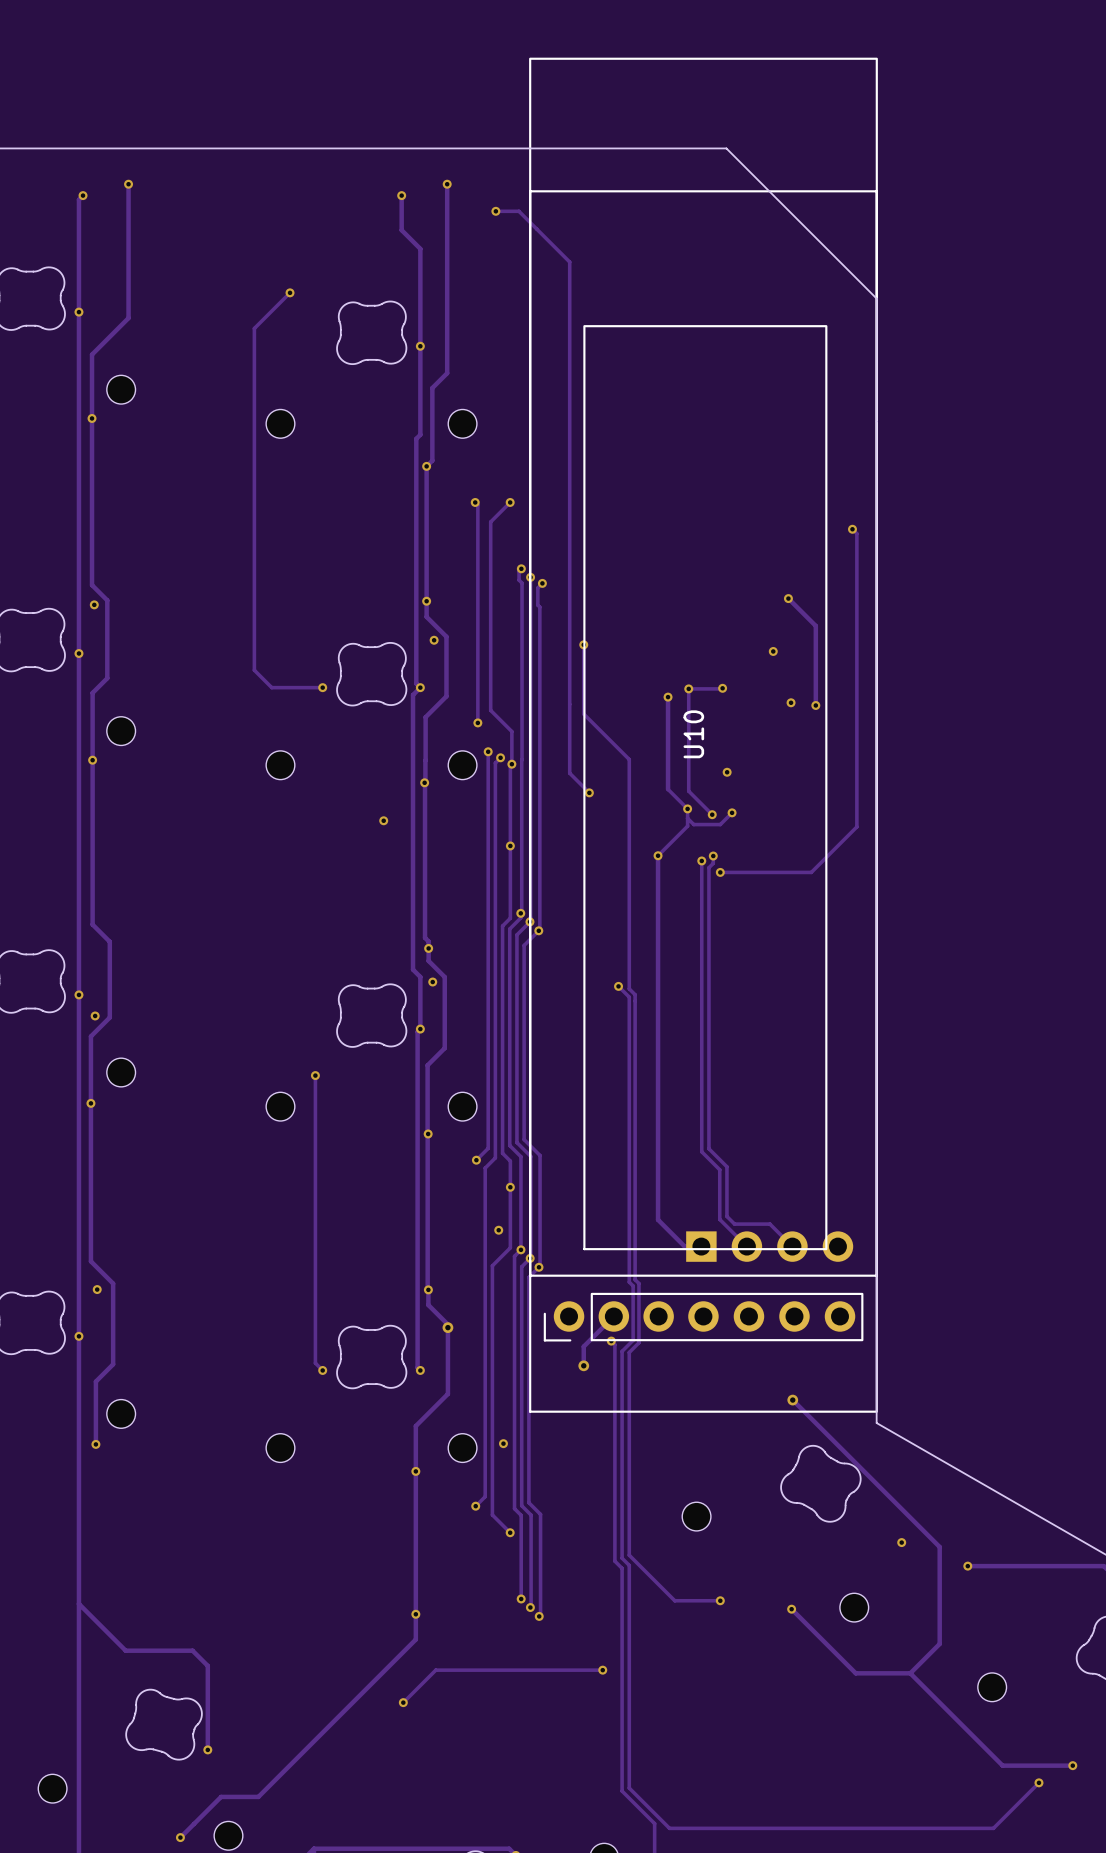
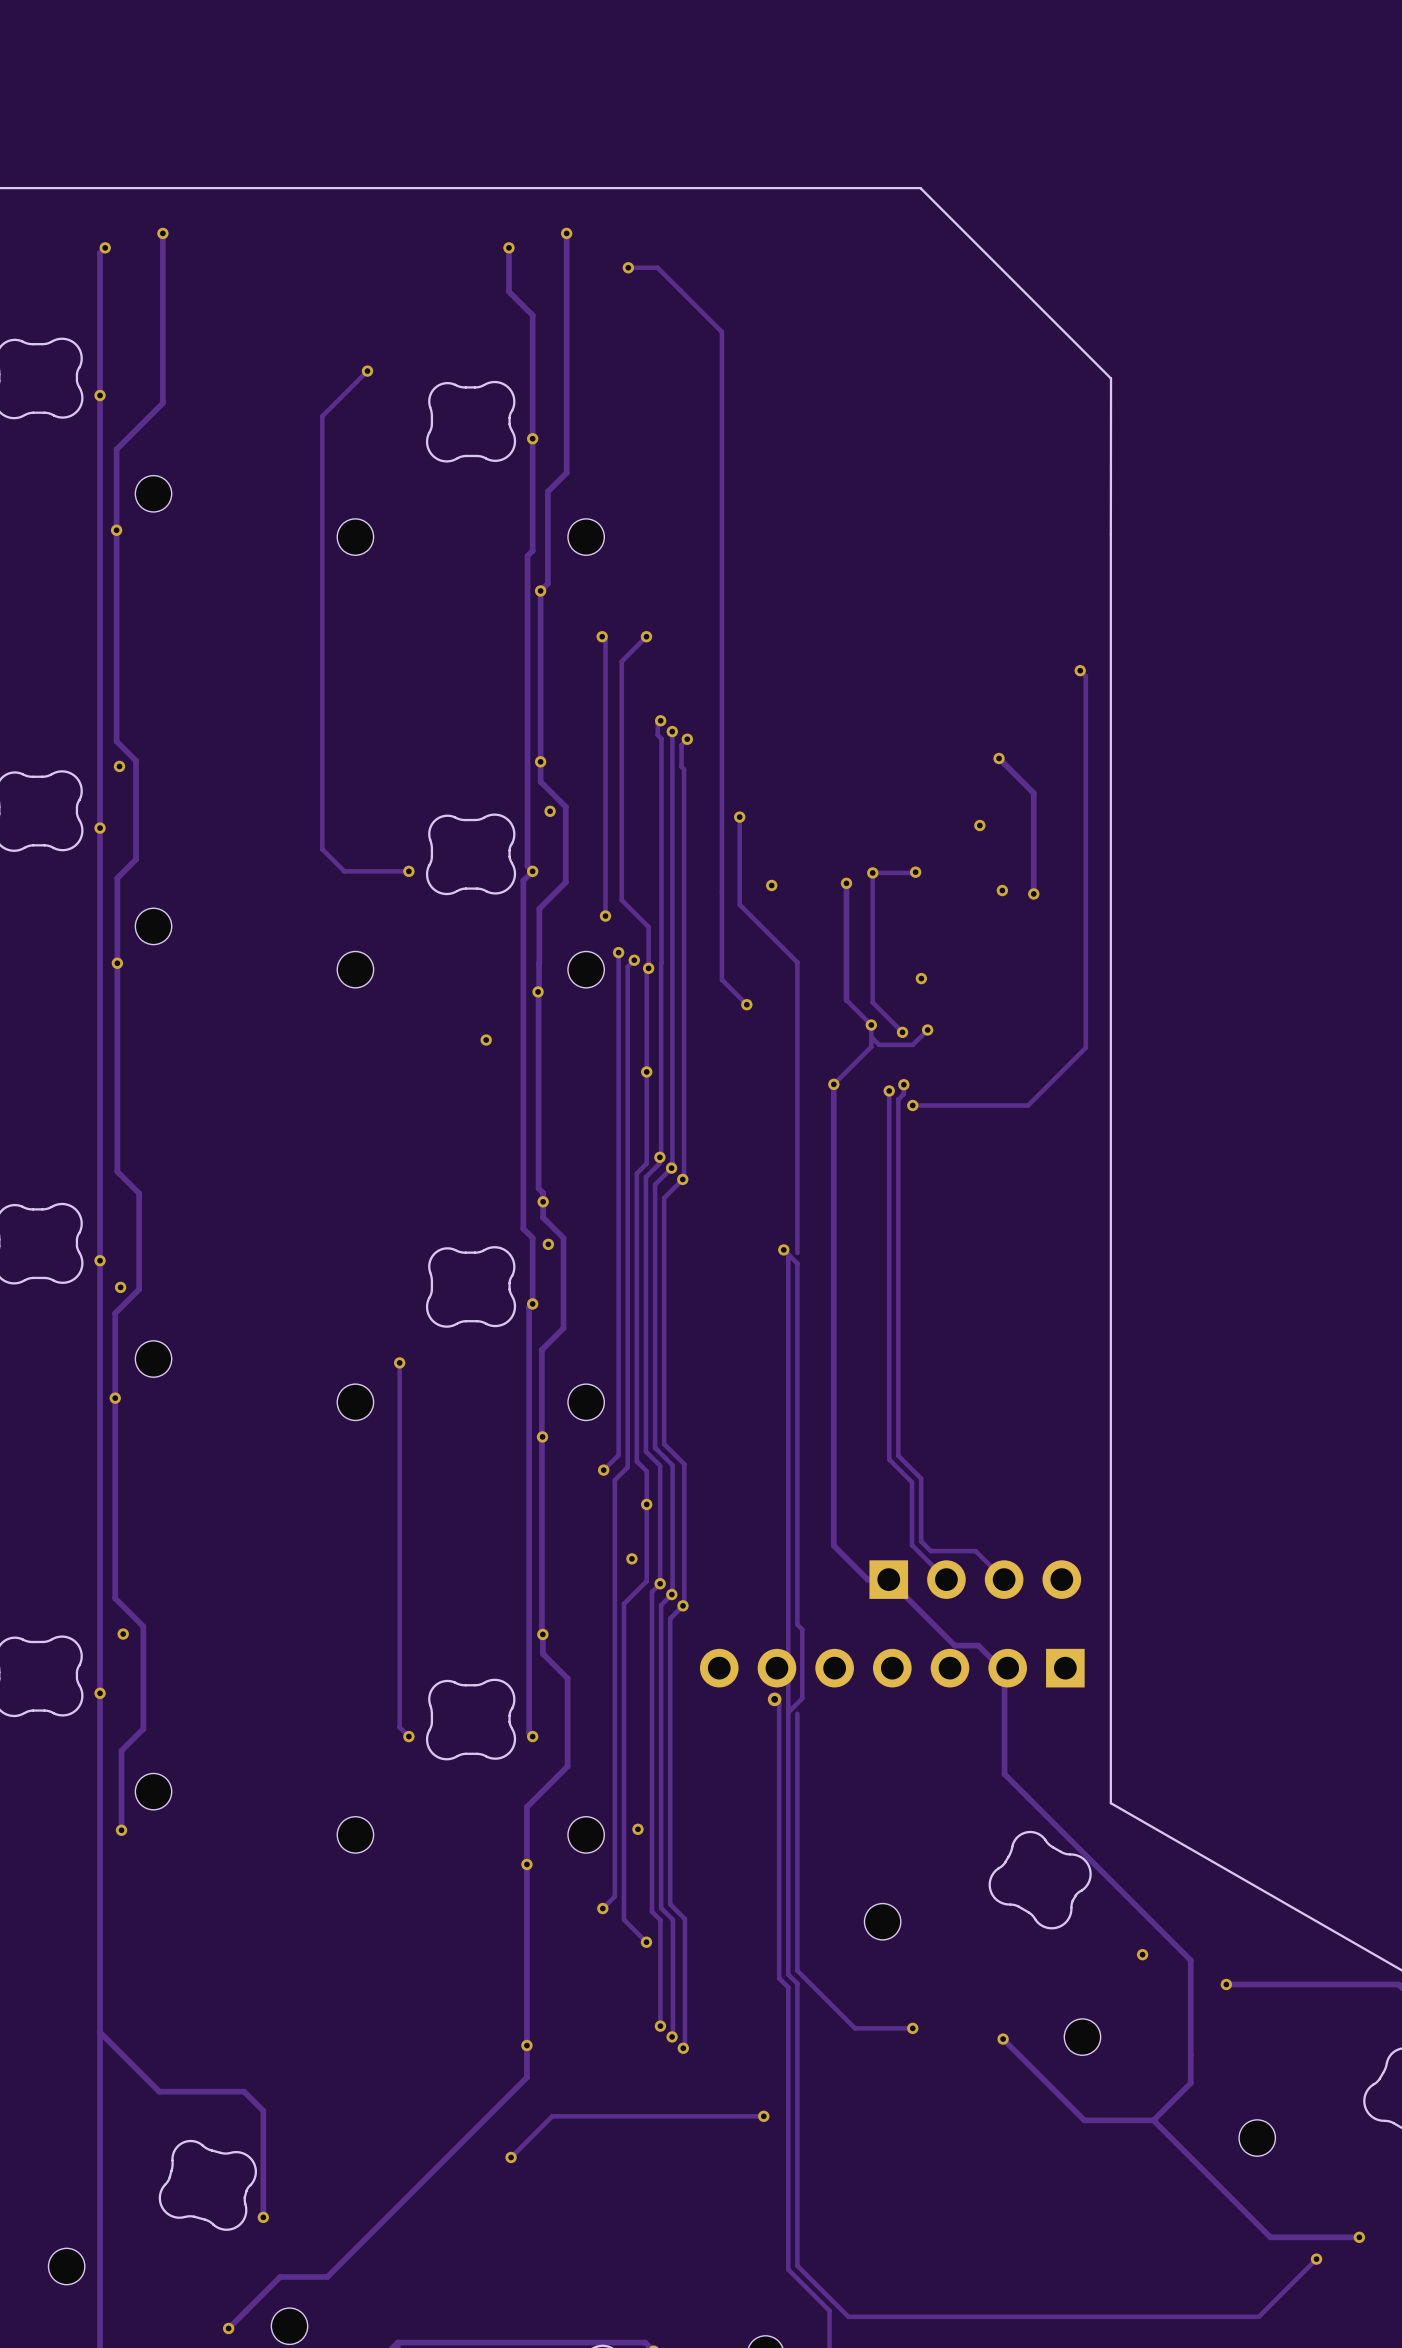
via: none -> (771, 885)
U10: (703, 735) -> none
track: (629, 988) (635, 994) (635, 1279) (638, 1283) (638, 1342) (629, 1352) -> none
track: none -> (788, 1254) (788, 1712)
track: none -> (888, 1579) (954, 1645) (978, 1645) (1004, 1671) (1004, 1774)
track: (613, 1316) (583, 1346) (583, 1365) -> none
part: none -> (892, 1668)
via: (447, 1327) -> none
via: (611, 1341) -> none
via position: (583, 1365) -> (774, 1699)
via: (792, 1400) -> none

